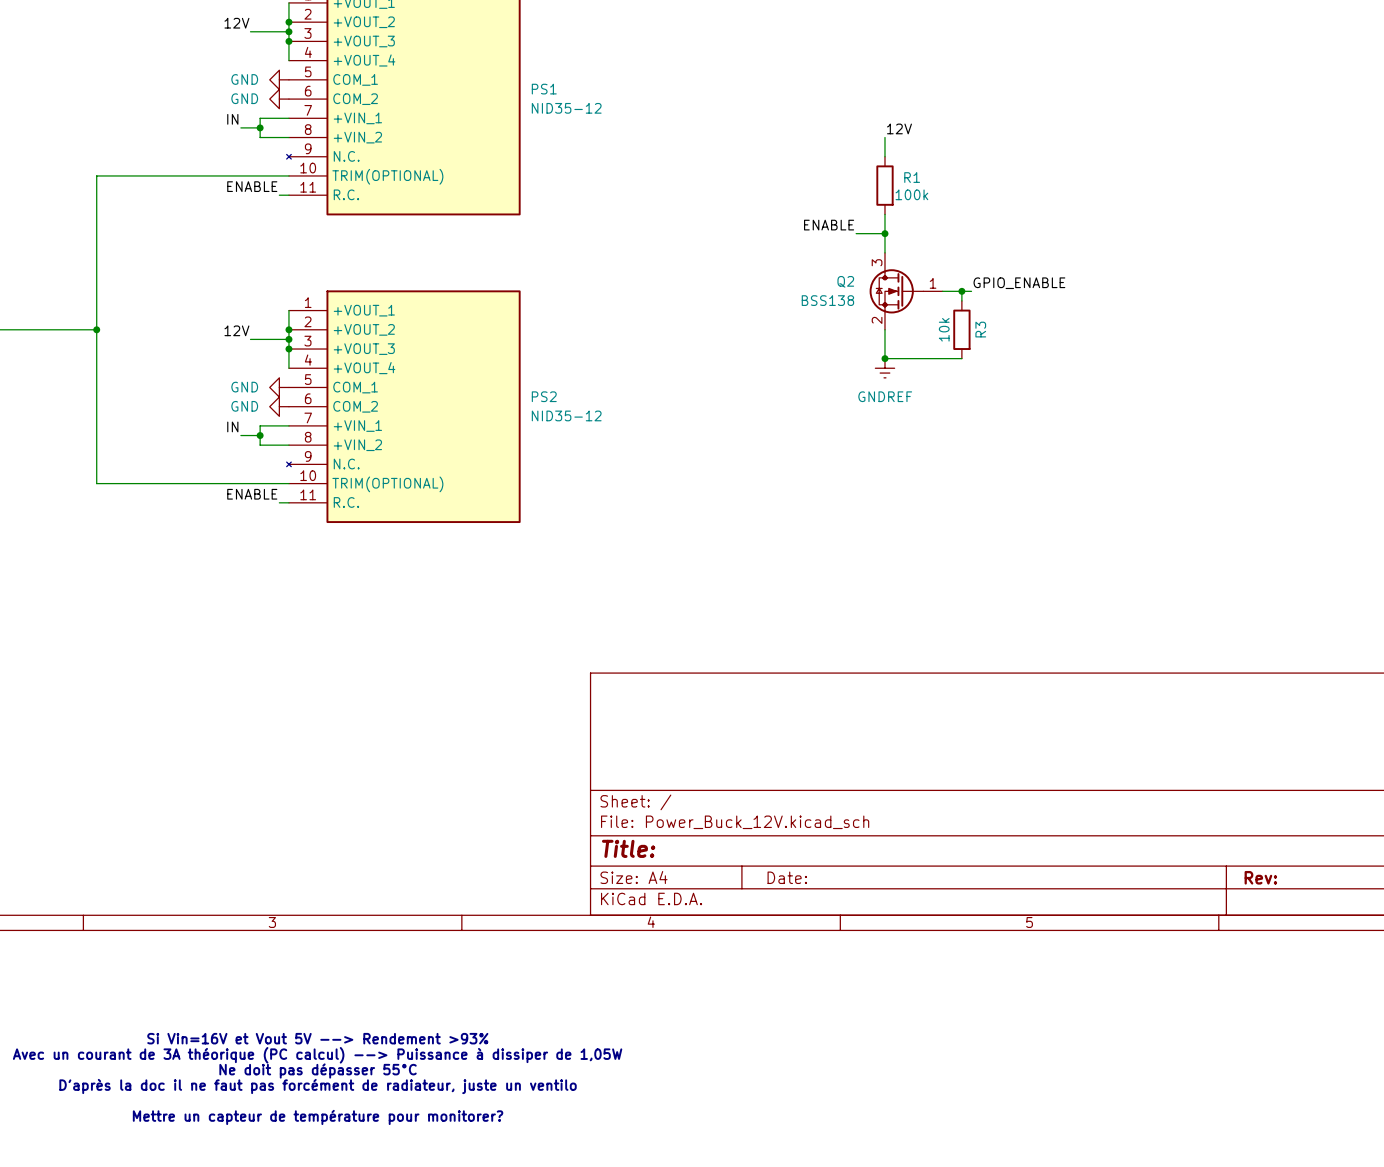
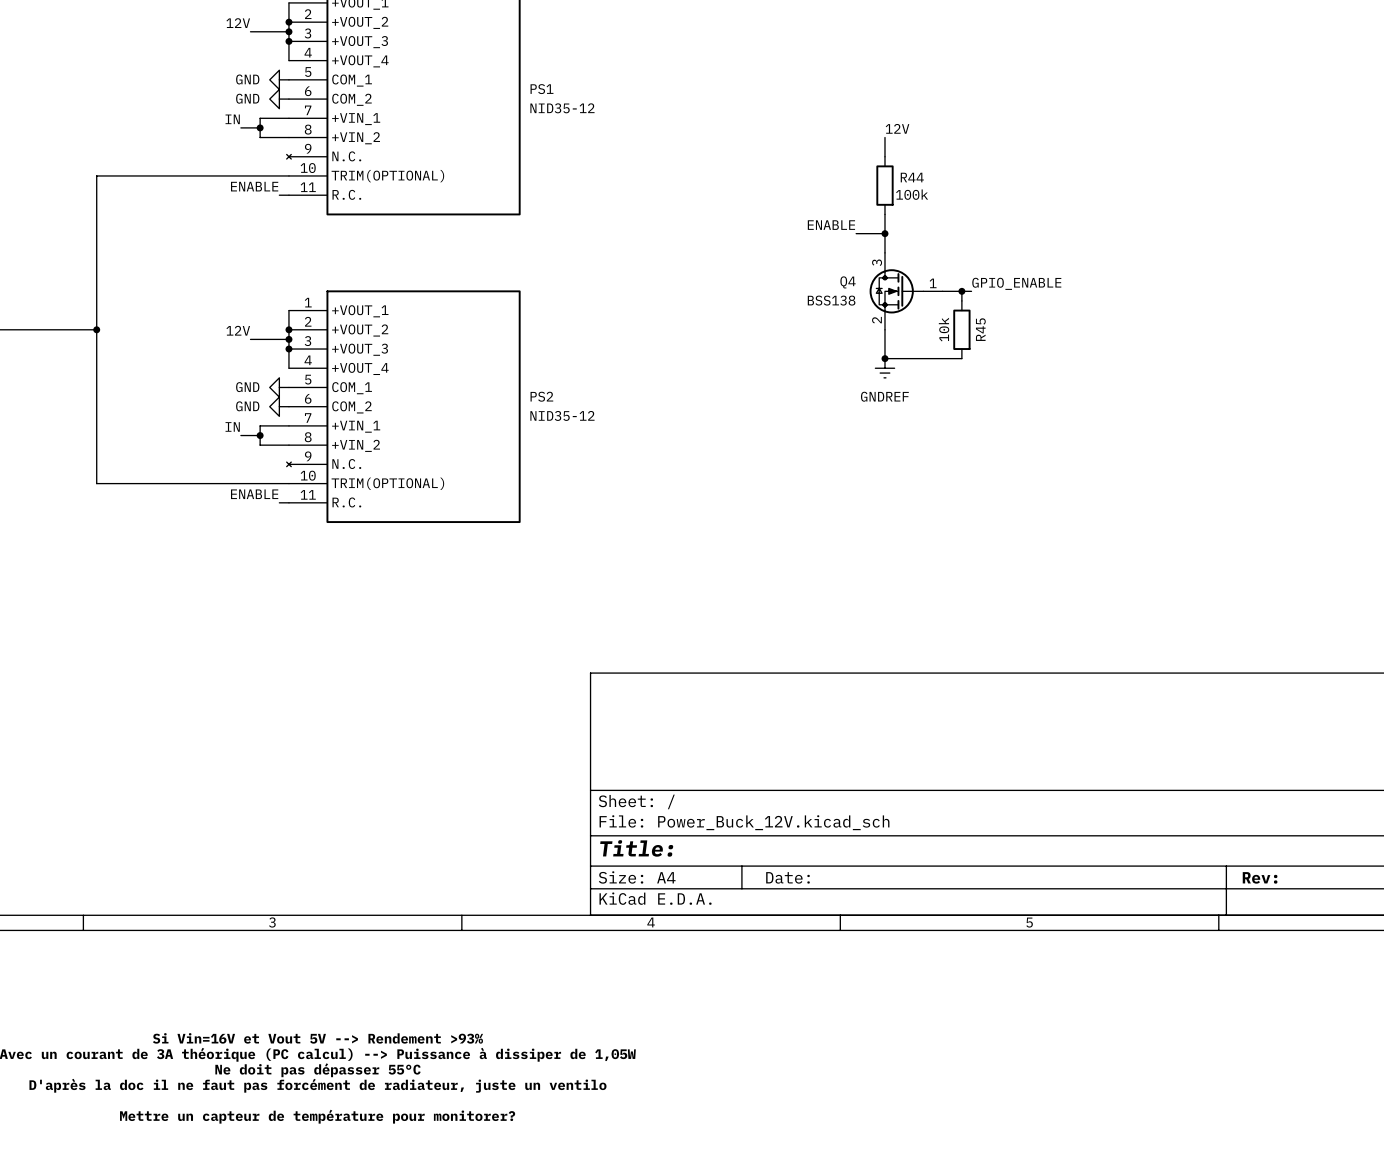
R1 name: R1 (912, 177) -> R44 (912, 177)
Q2 name: Q2 (845, 281) -> Q4 (848, 282)
R3 name: R3 (980, 329) -> R45 (980, 329)

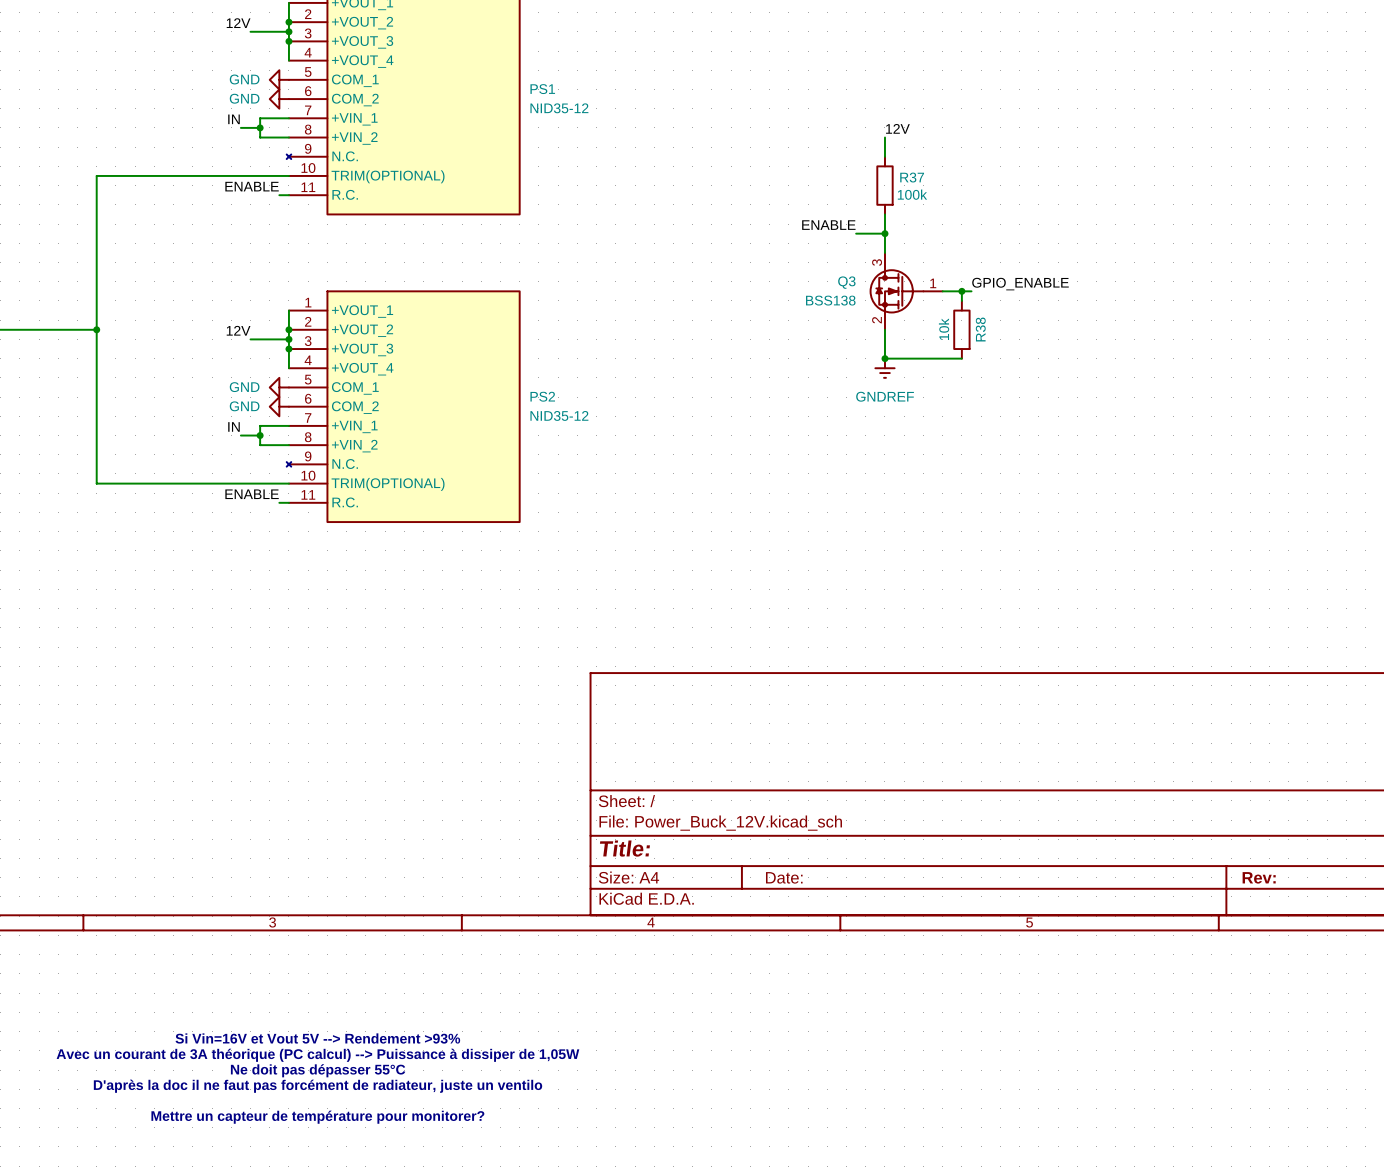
R44 name: R44 (912, 177) -> R37 (912, 177)
Q4 name: Q4 (848, 282) -> Q3 (846, 282)
R45 name: R45 (980, 329) -> R38 (980, 329)

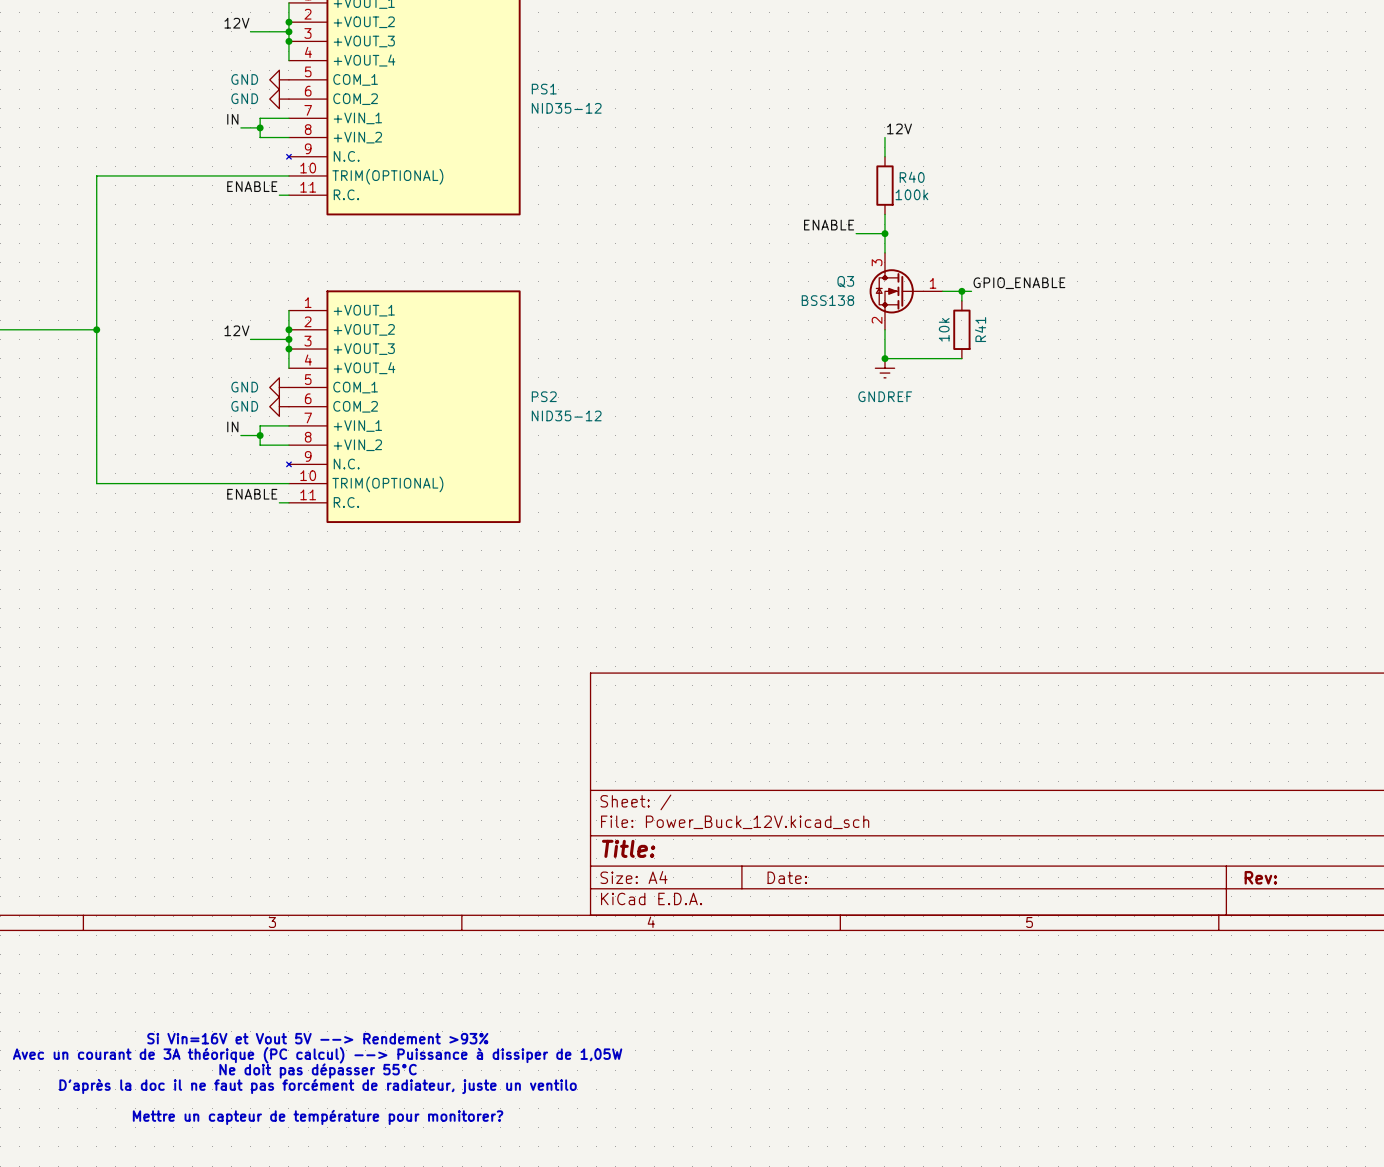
R37 name: R37 (912, 177) -> R40 (912, 177)
R38 name: R38 (980, 329) -> R41 (980, 329)

